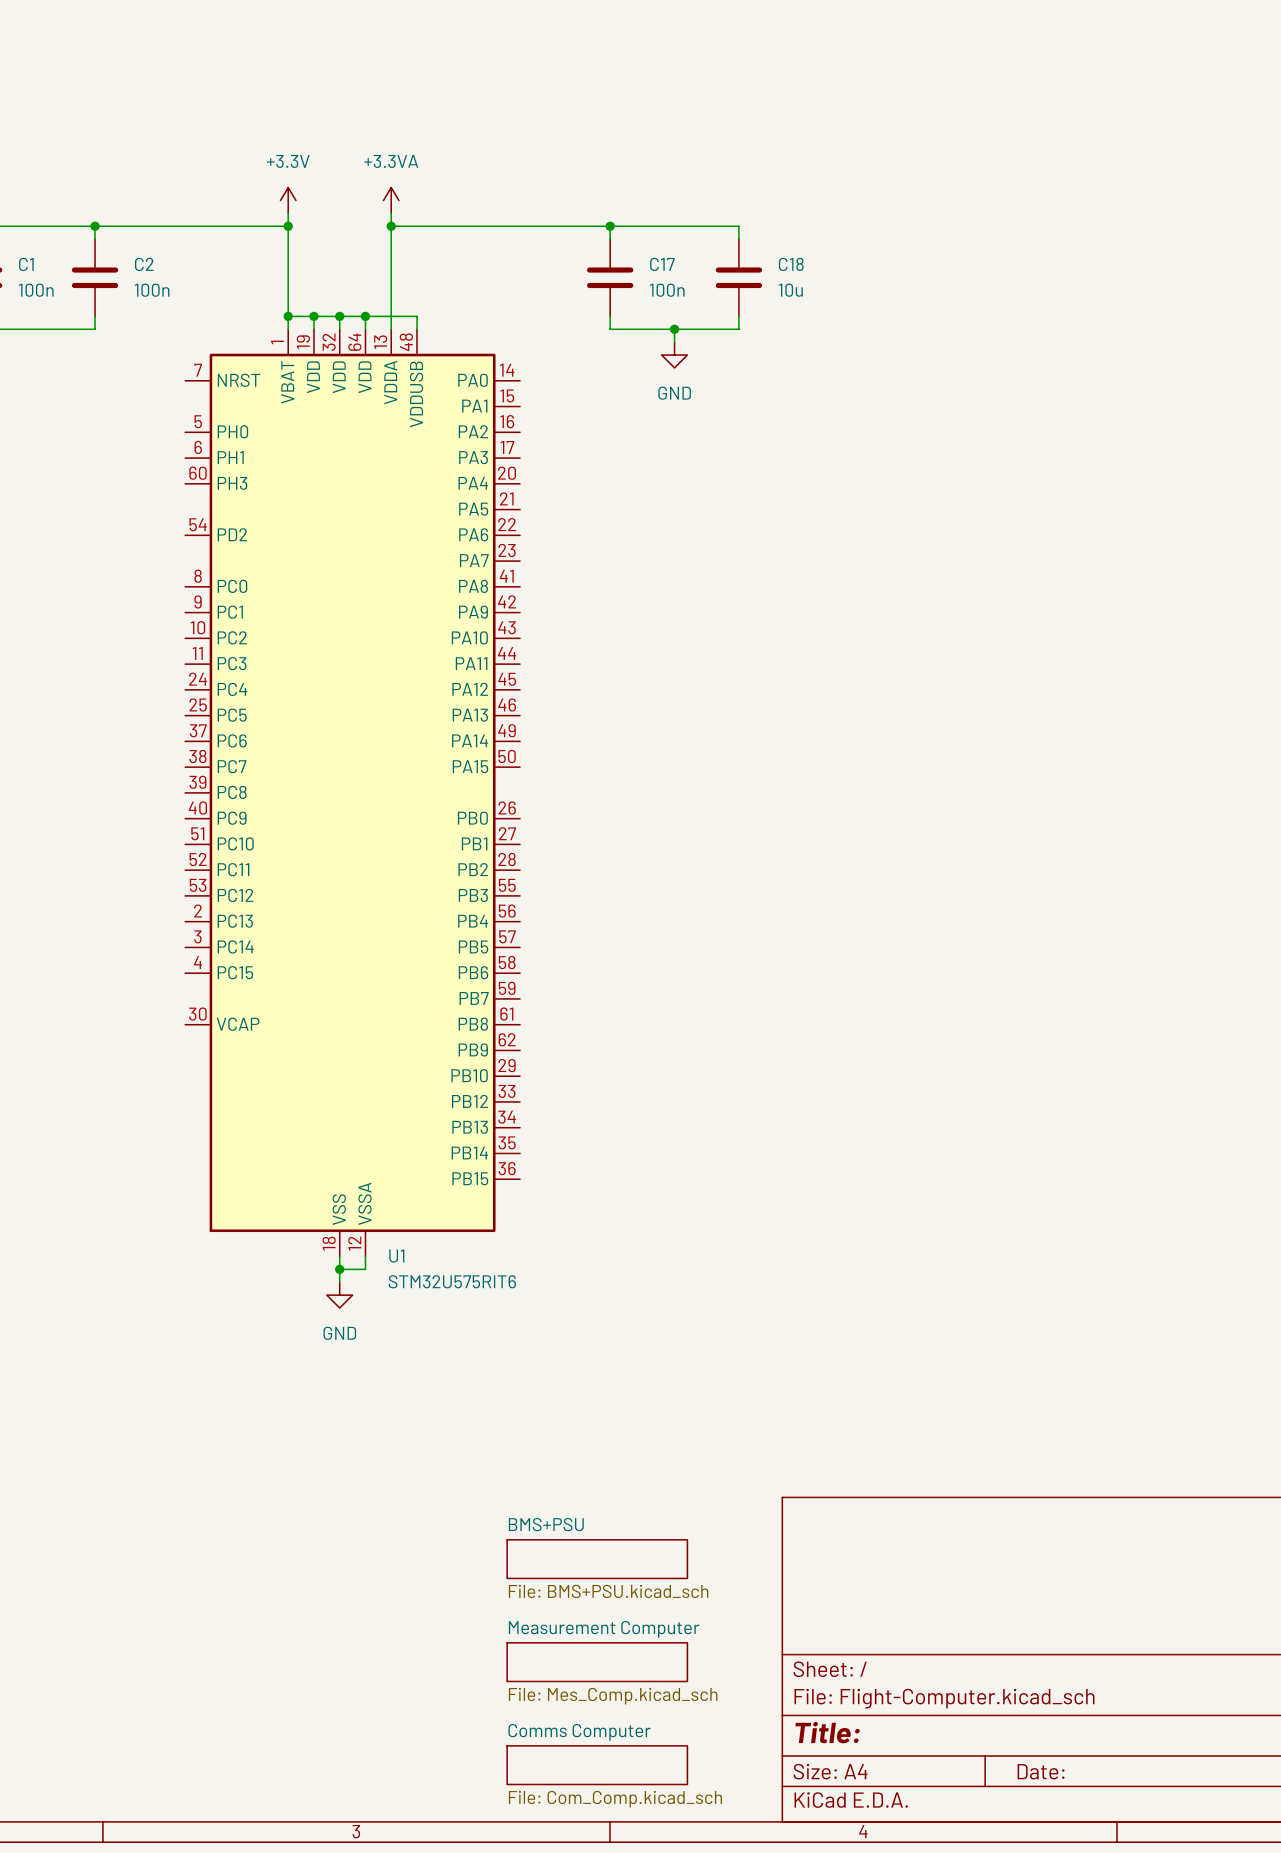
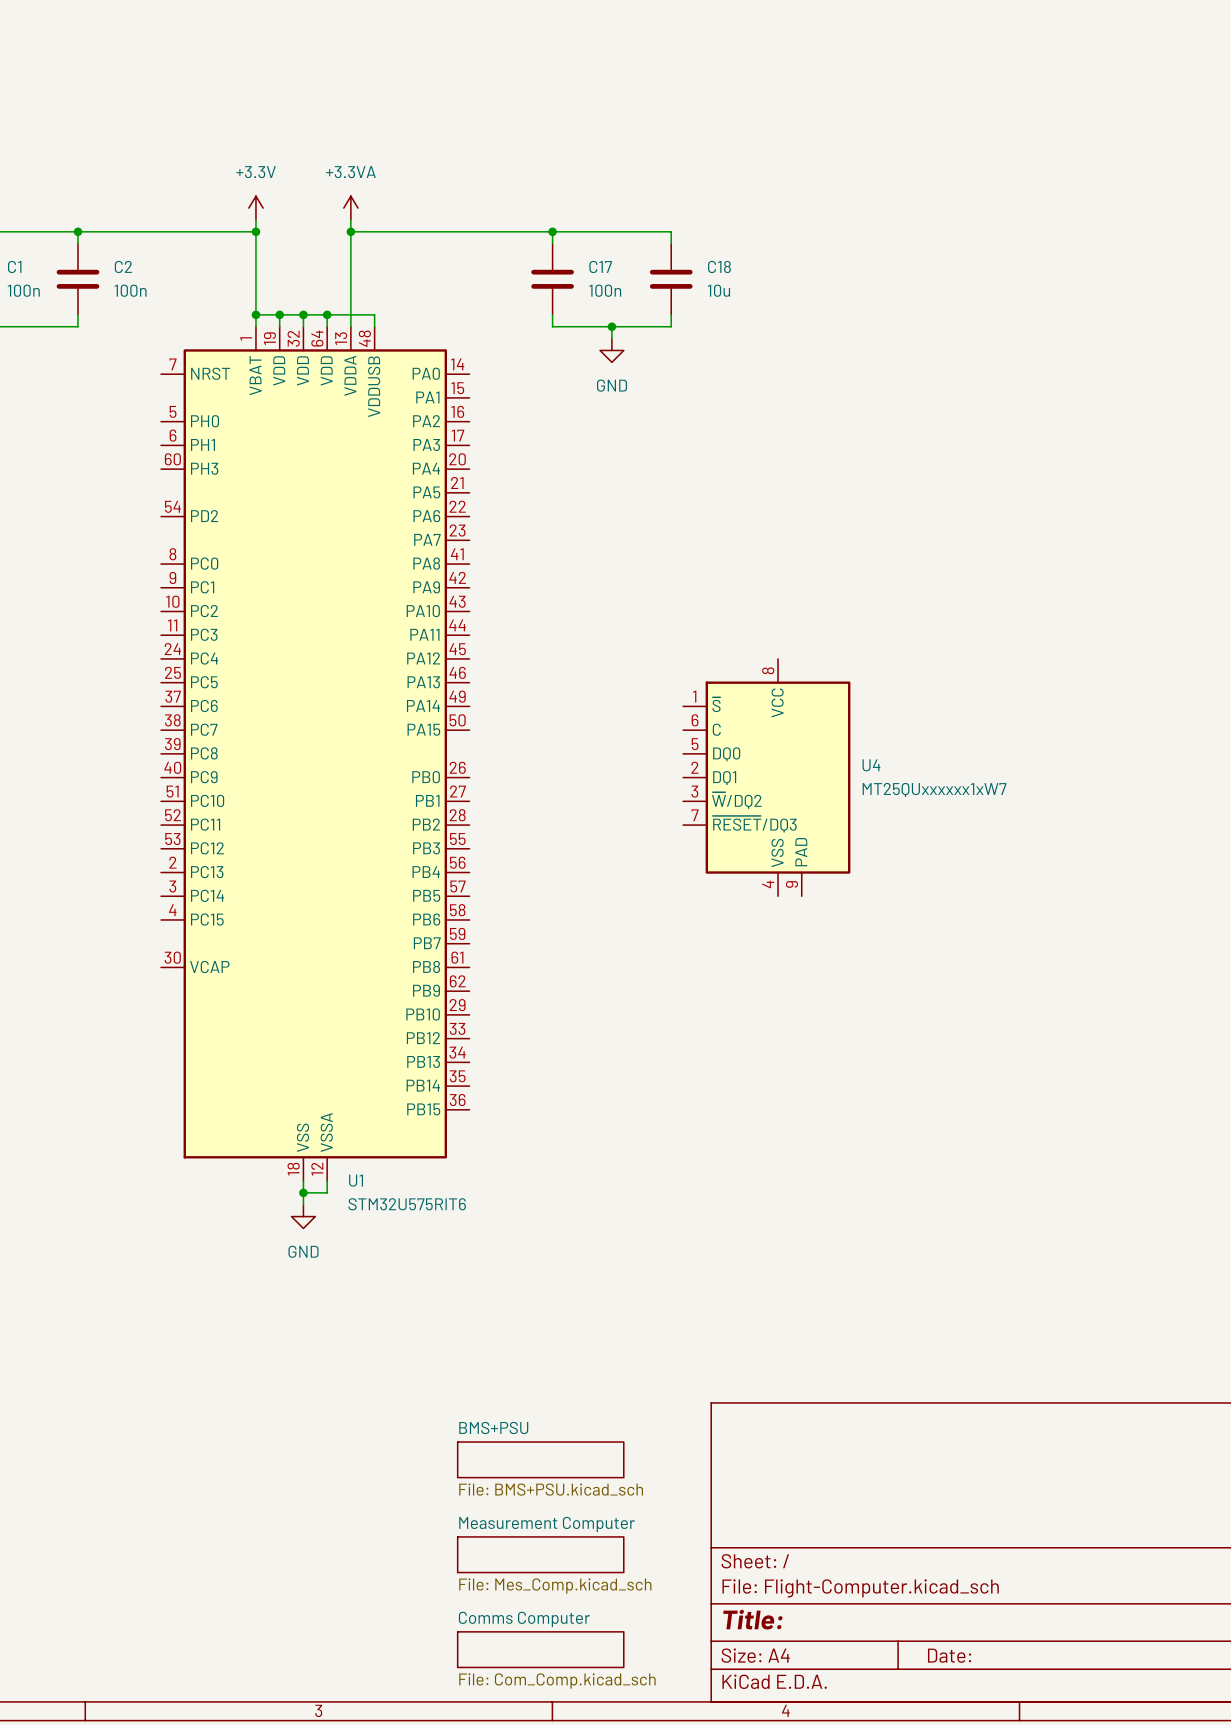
U4: none -> MT25QUxxxxxx1xW7 (766, 777)

